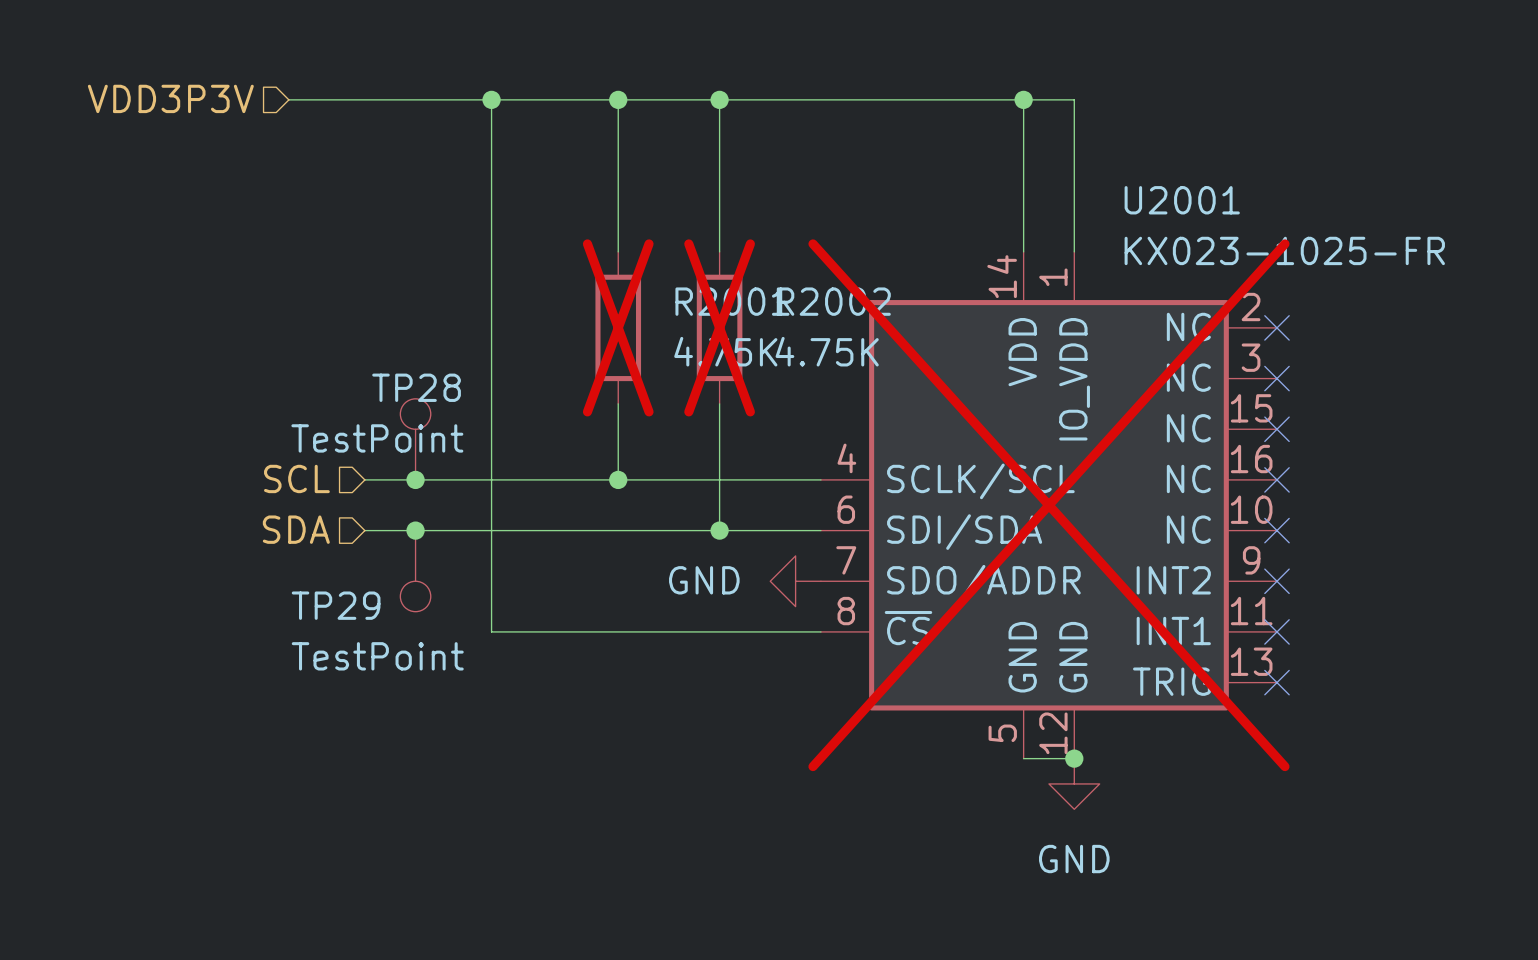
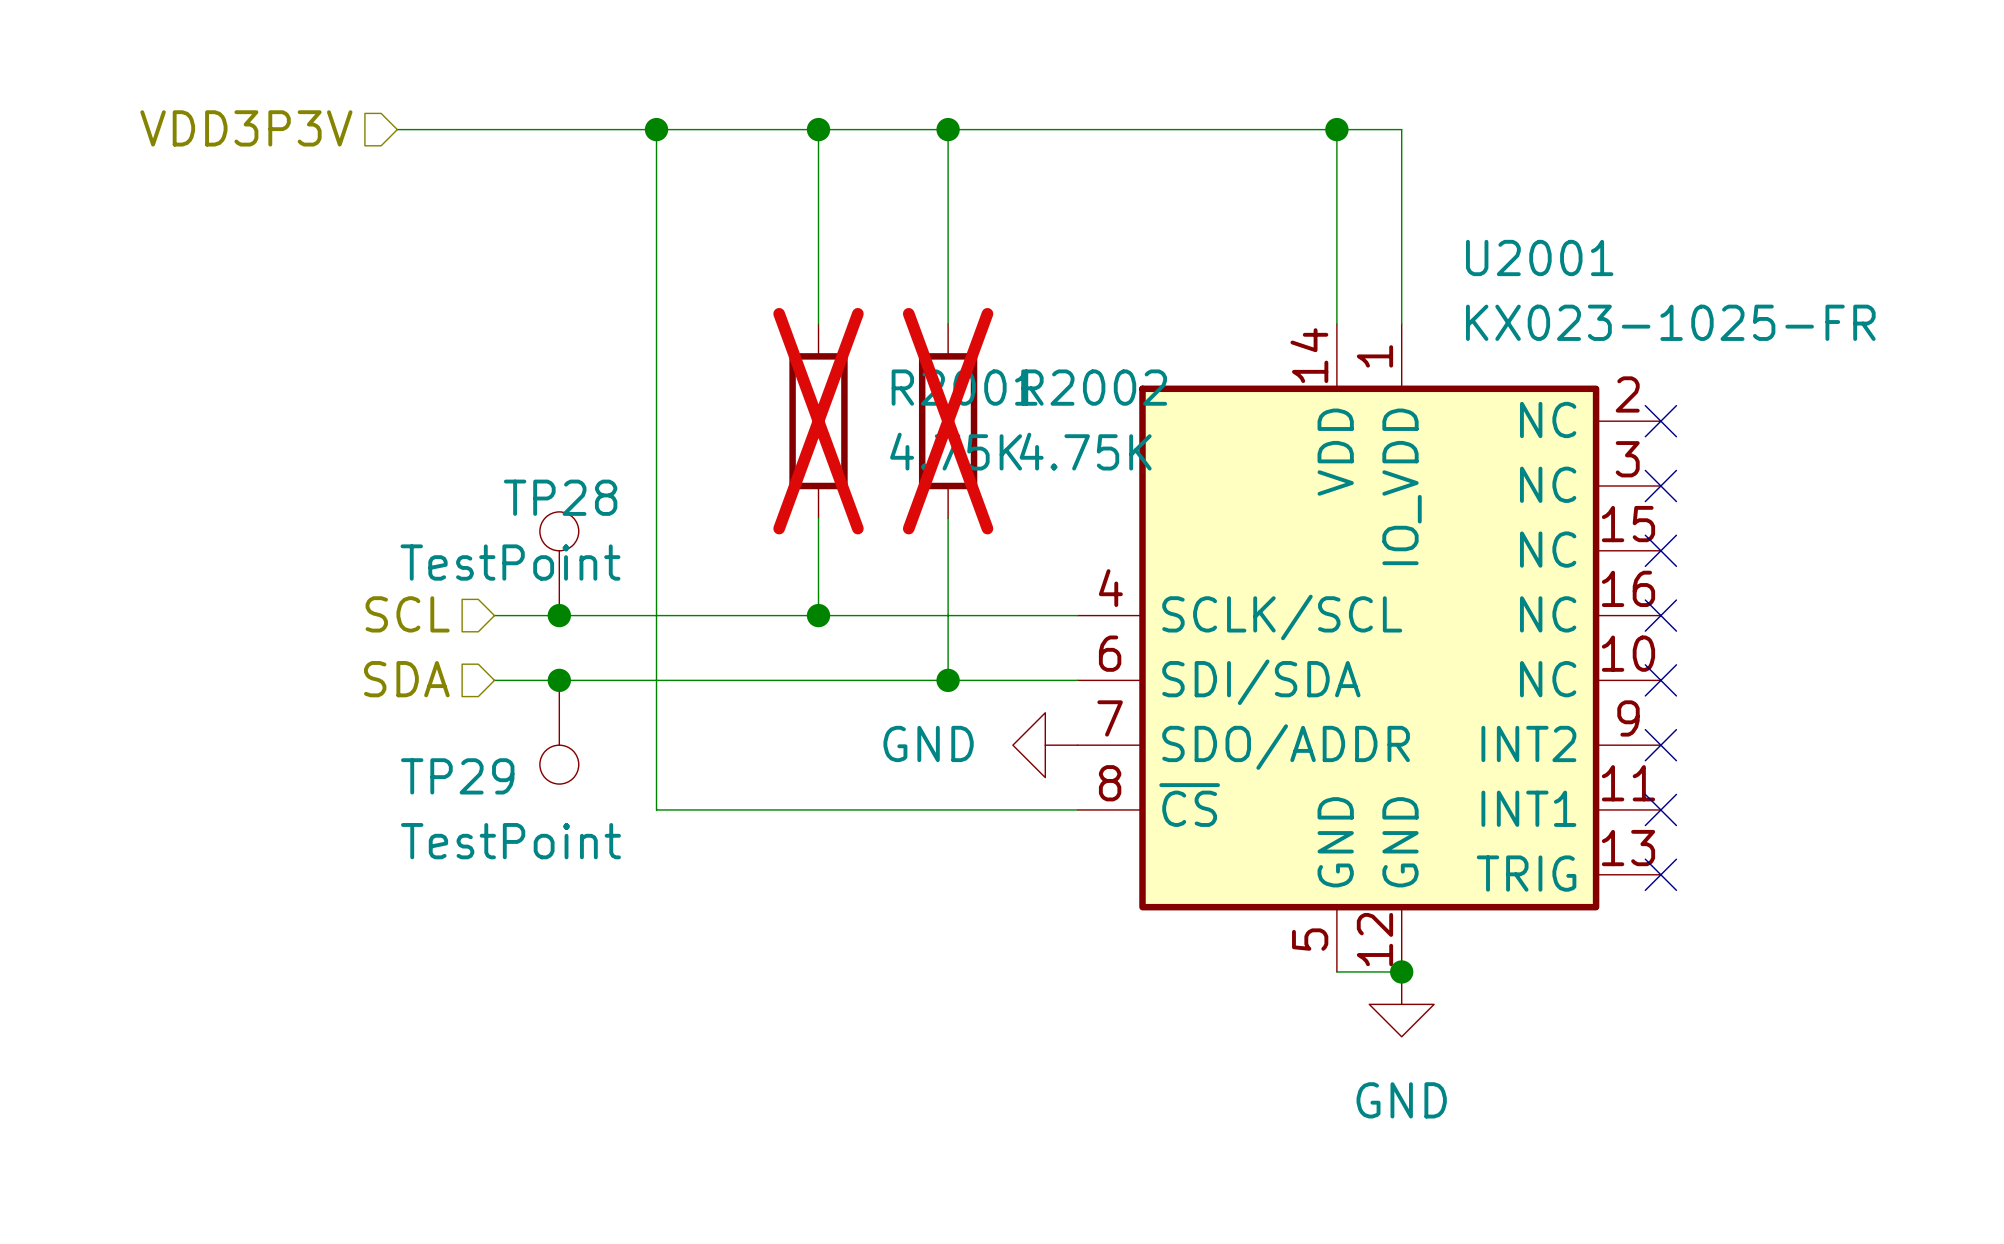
U2001 do-not-place cross: (1048, 505) -> none

